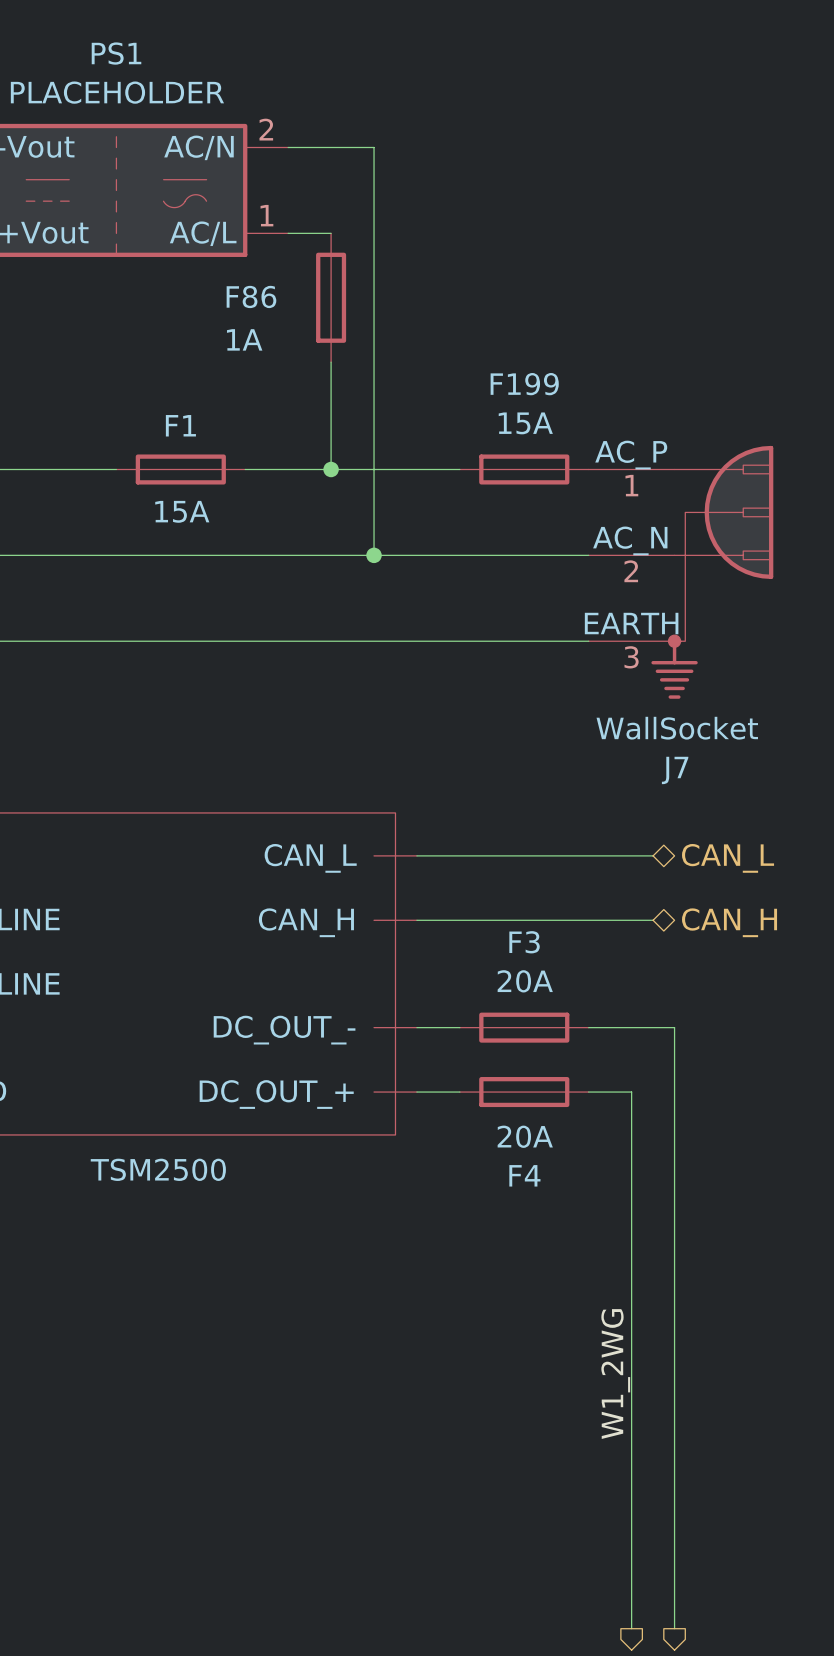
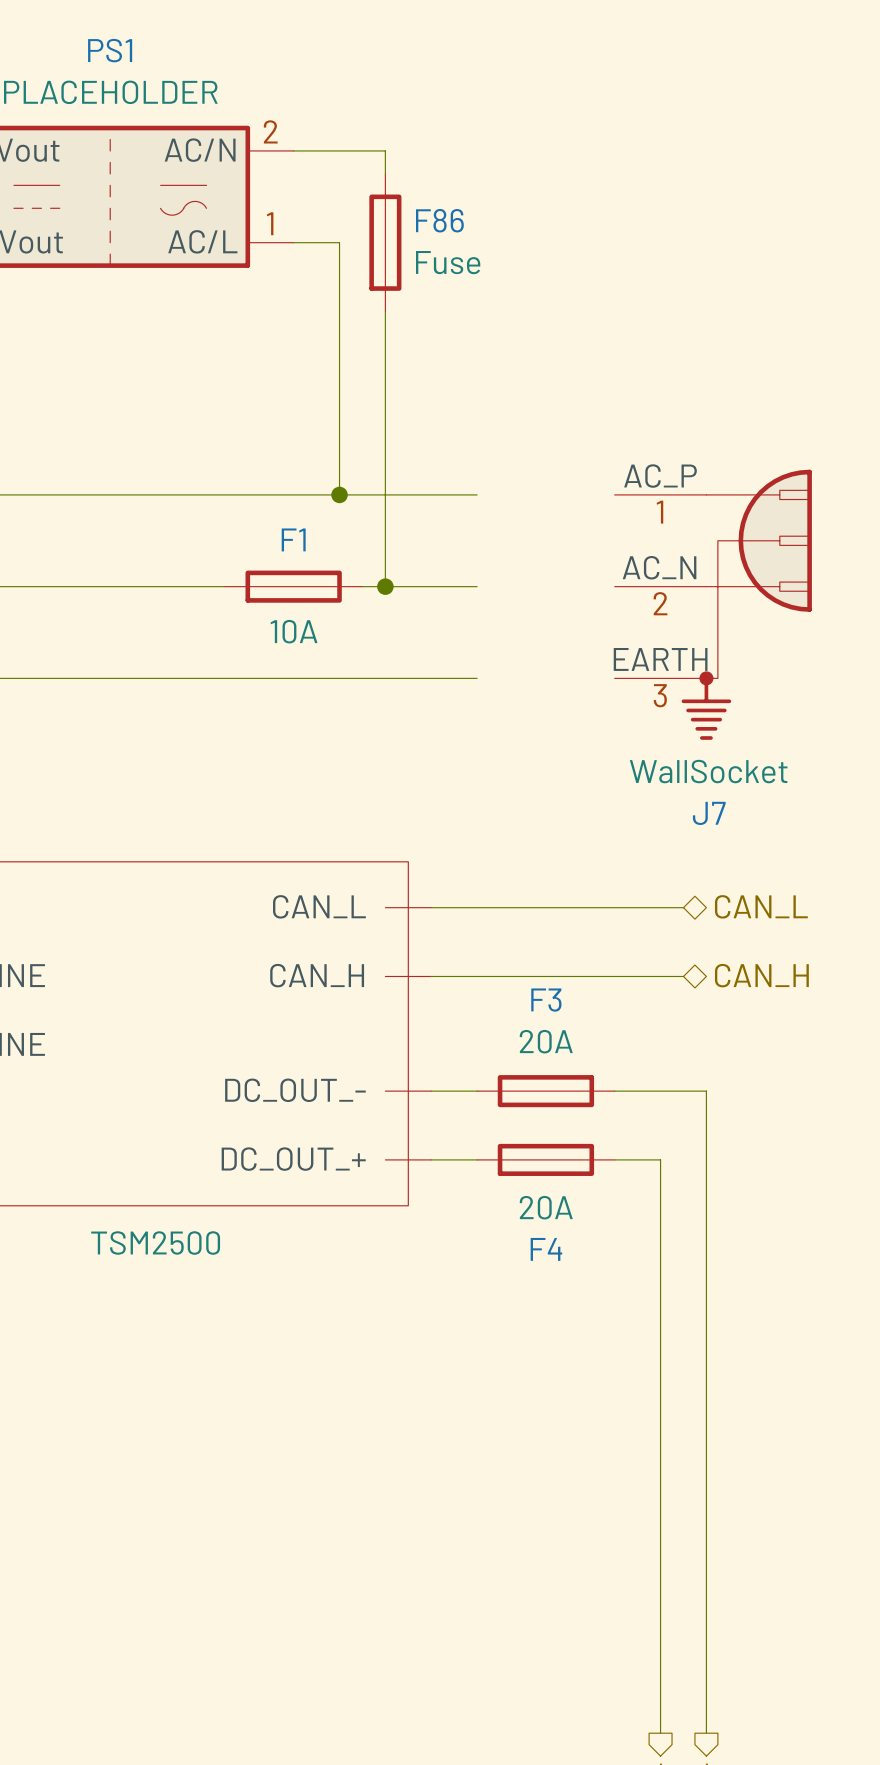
F86 name position: F86 (251, 296) -> F86 (439, 220)
F86 position: (331, 297) -> (385, 242)
F86 value: 1A (244, 339) -> Fuse (448, 262)
F1 position: (180, 469) -> (293, 586)
F199: 15A (524, 469) -> none
F1 value: 15A (182, 511) -> 10A (294, 631)
wire: (459, 555) (588, 555) -> none
wire: (459, 641) (588, 641) -> none
label: W1_2WG (615, 1374) -> none

